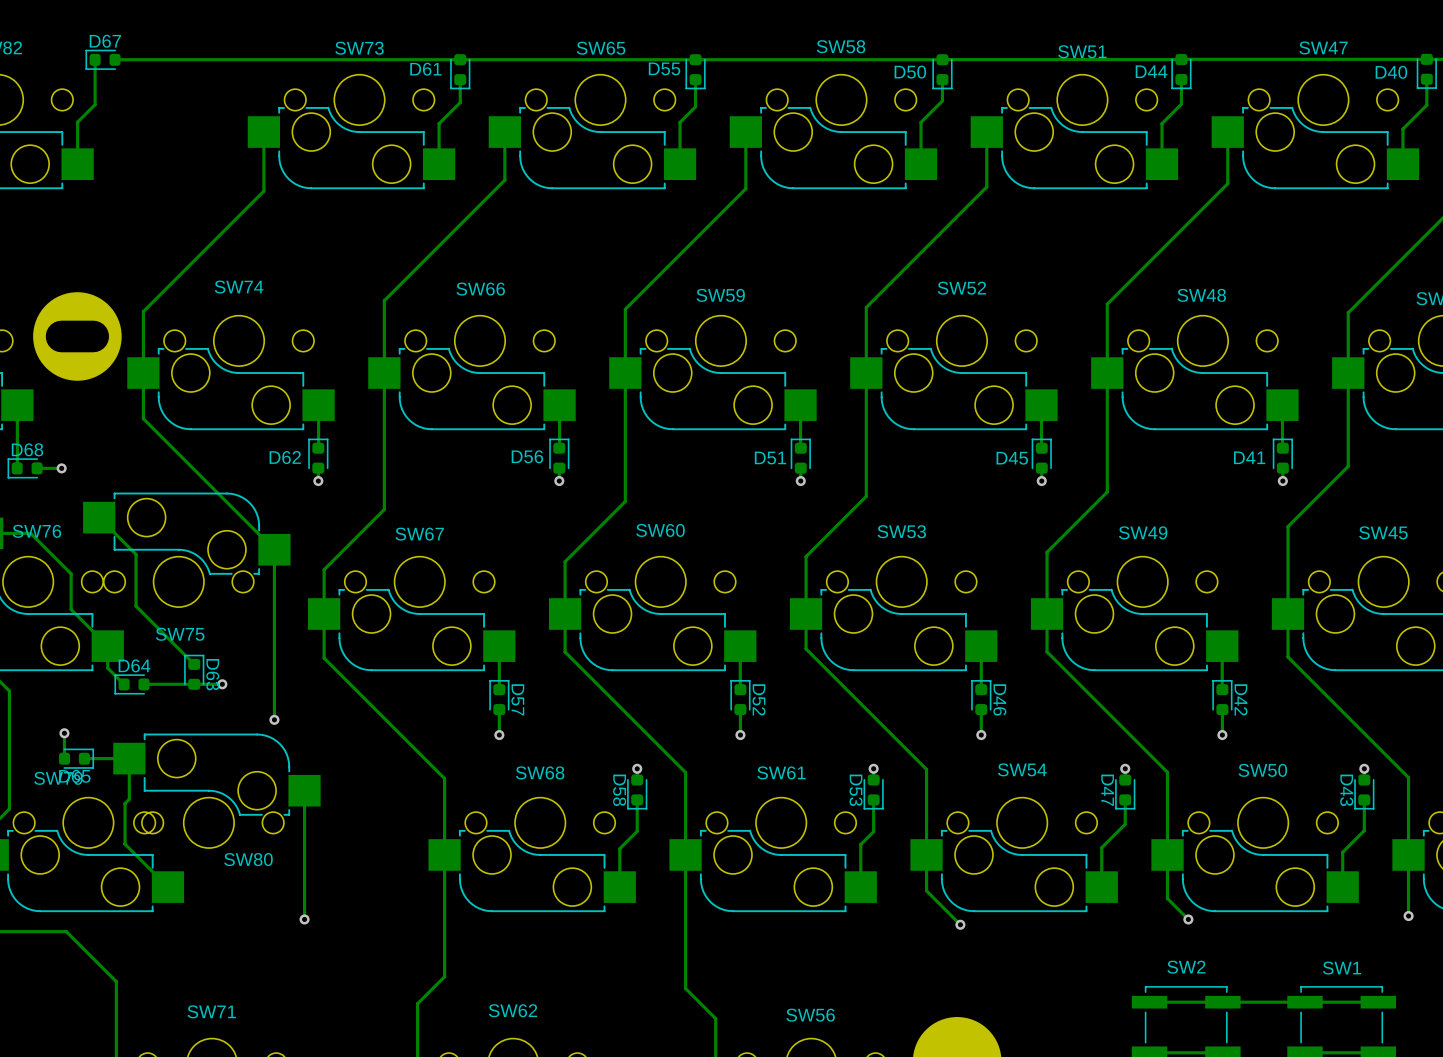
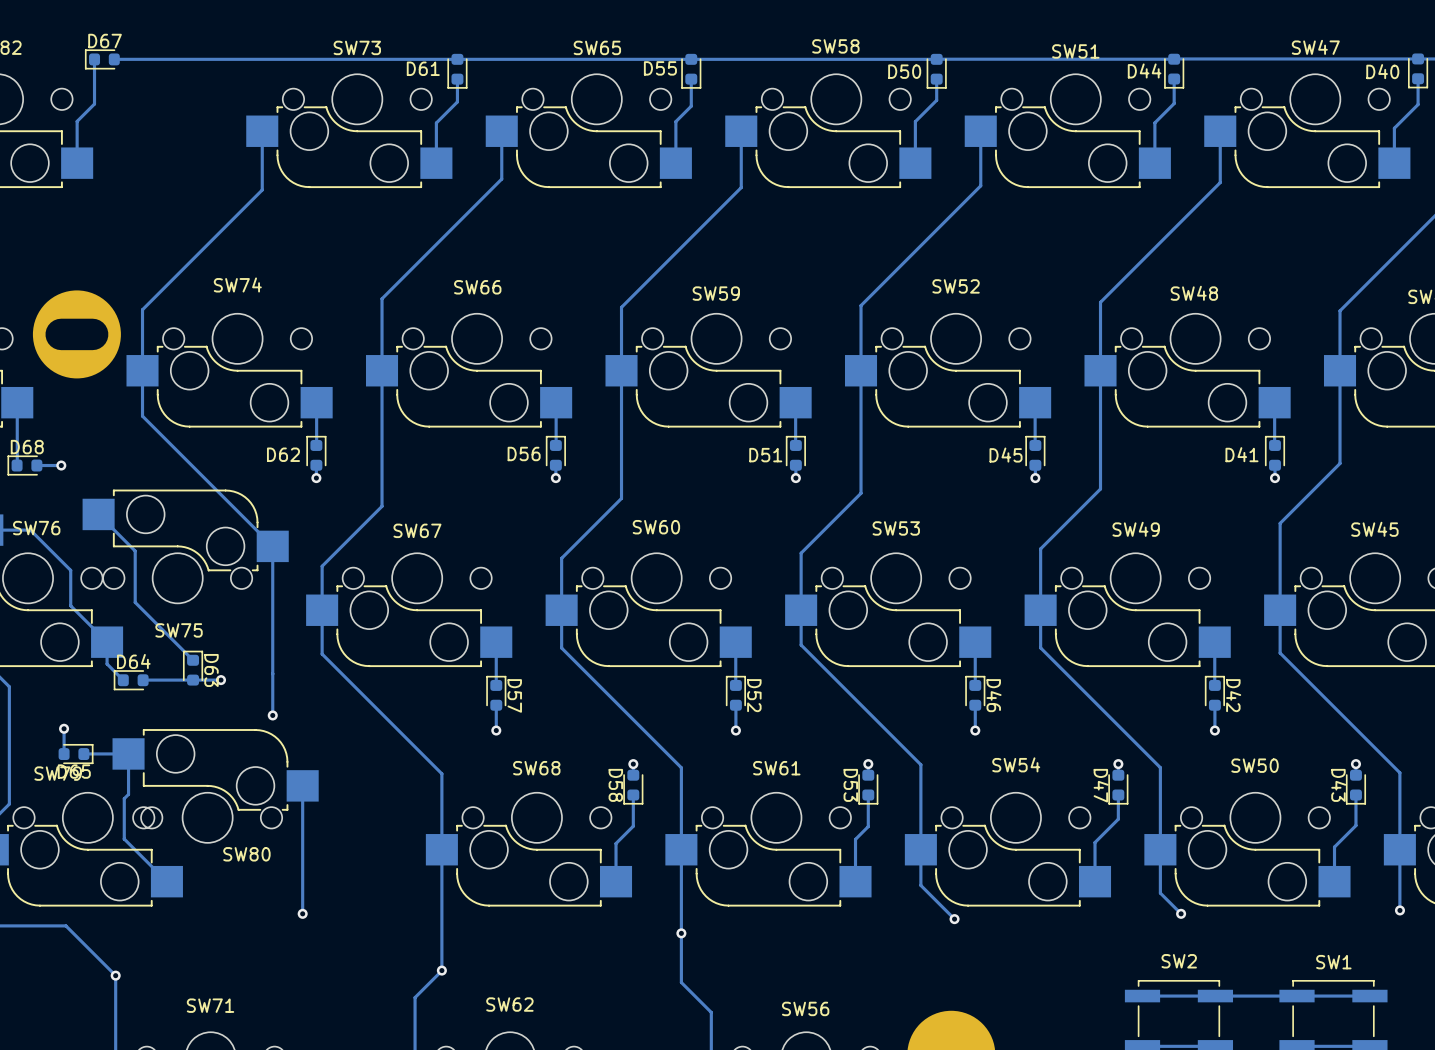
via: none -> (681, 933)
via: none -> (441, 970)
via: none -> (115, 975)

